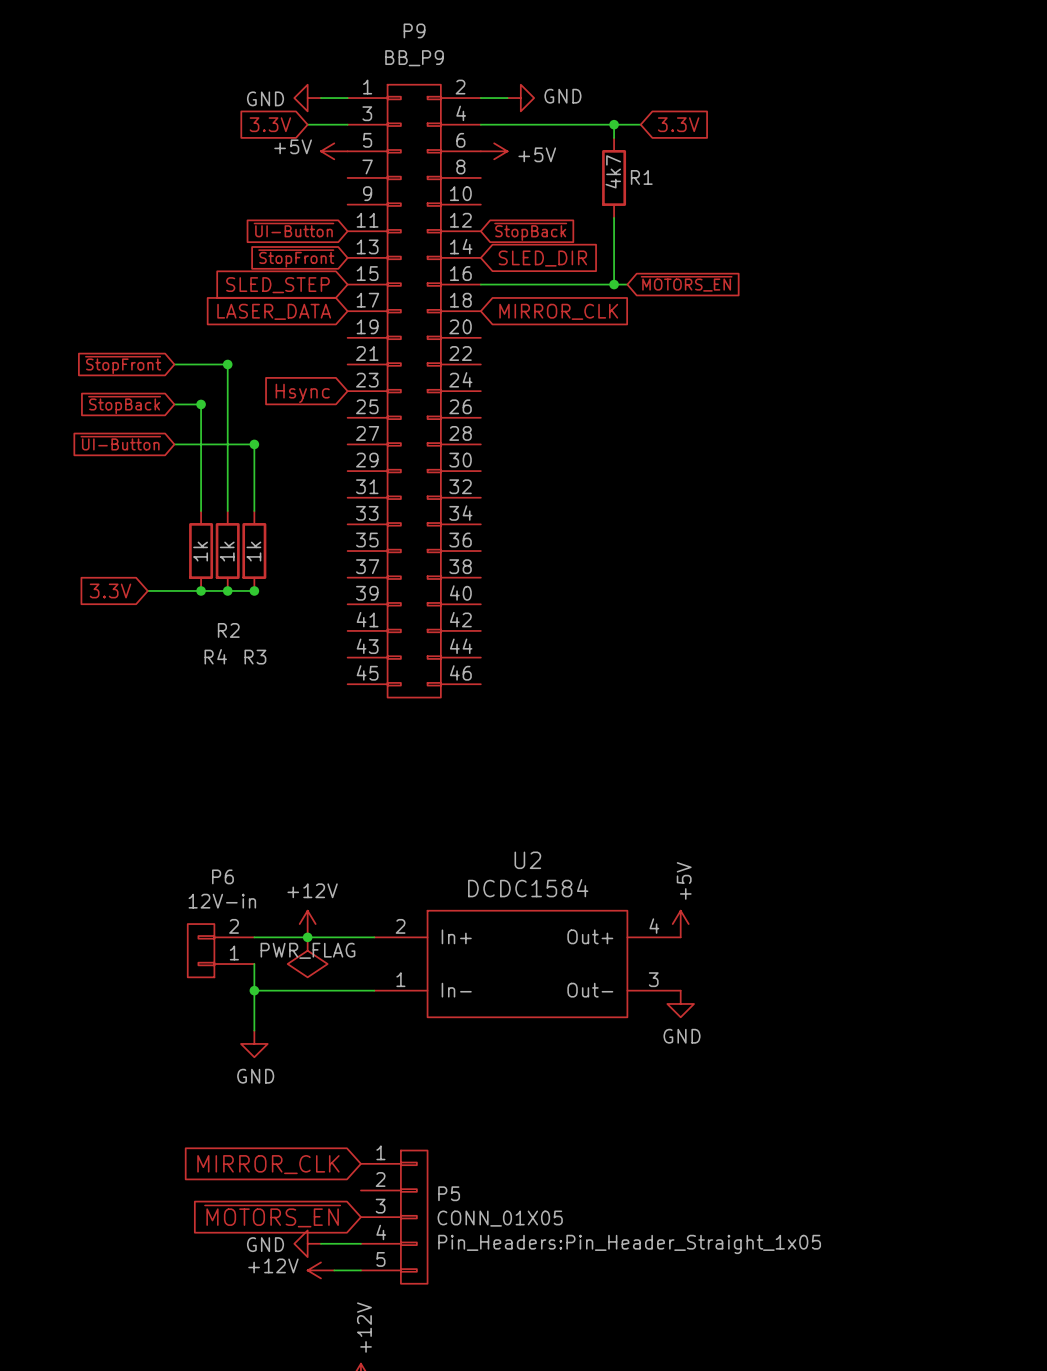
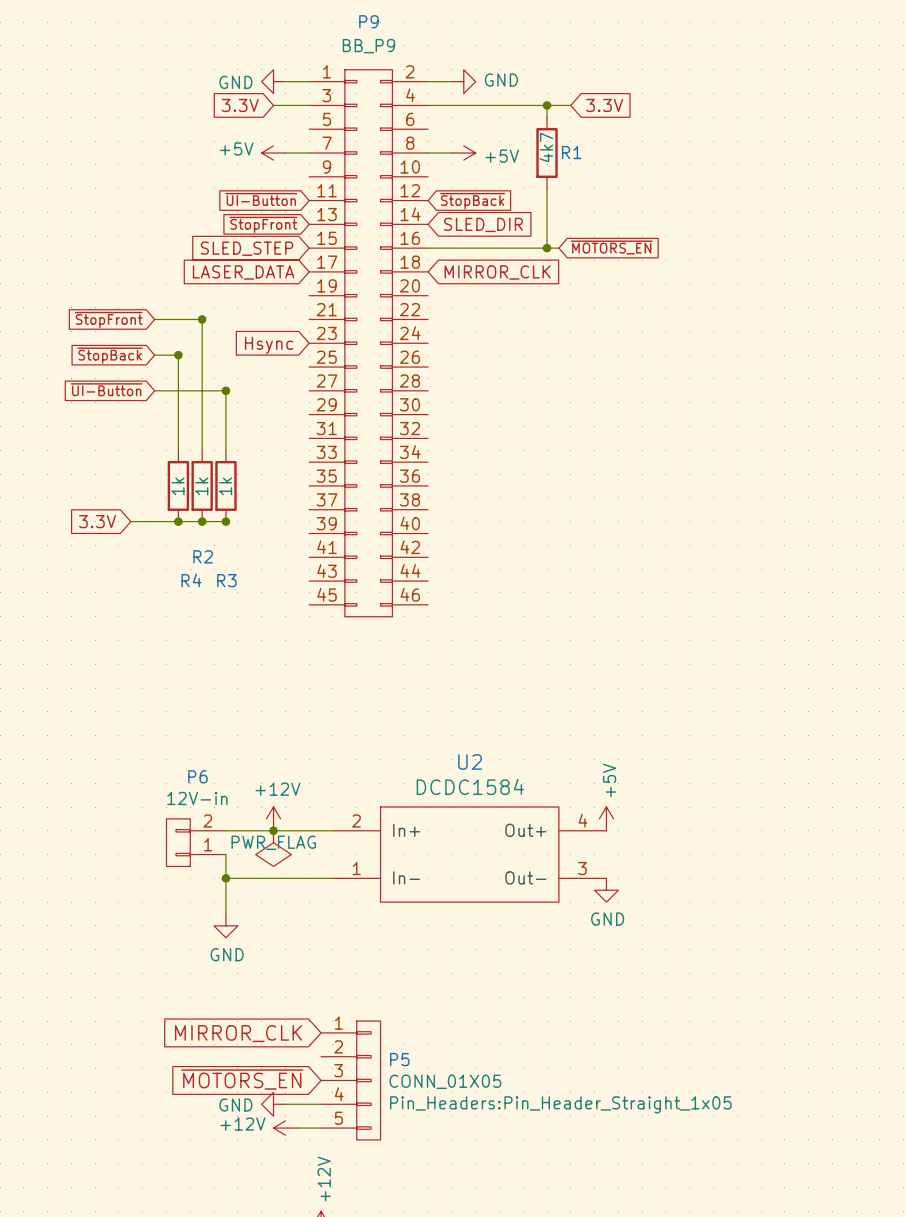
power symbol position: +5V (334, 151) -> +5V (273, 153)
power symbol position: +5V (494, 151) -> +5V (463, 153)
wire: none -> (285, 153) (309, 153)
wire: none -> (428, 153) (451, 153)

